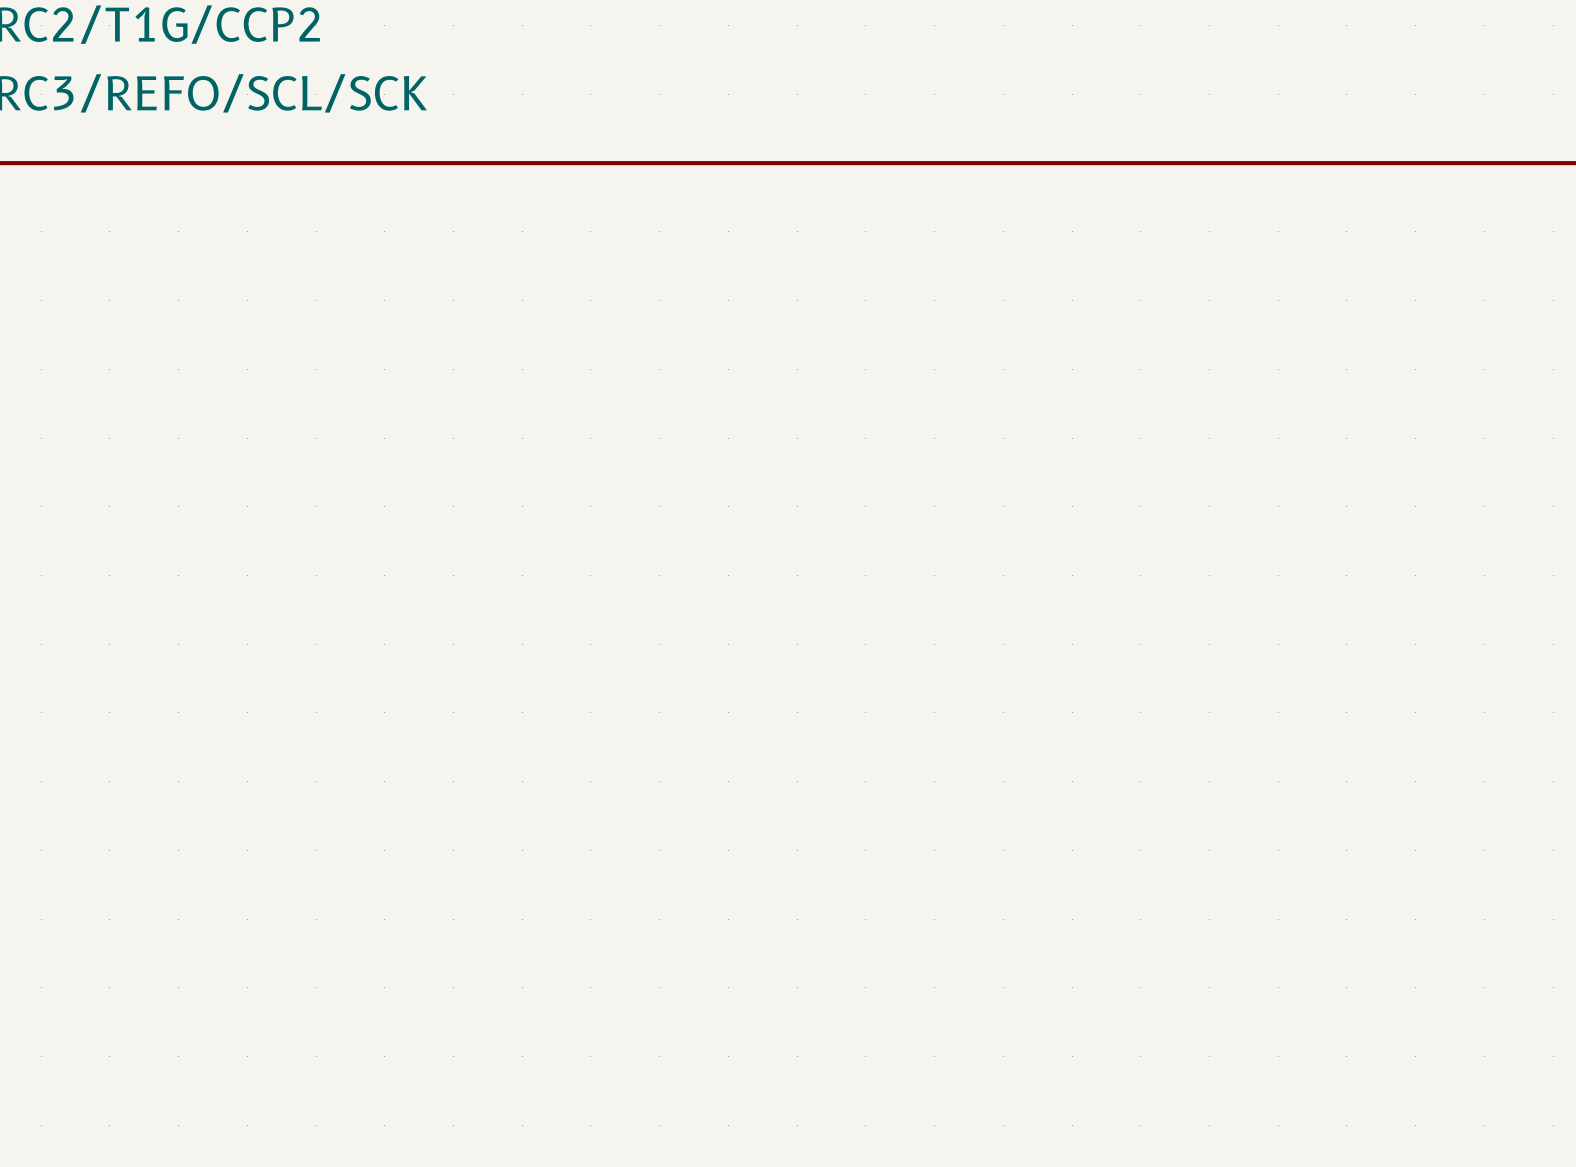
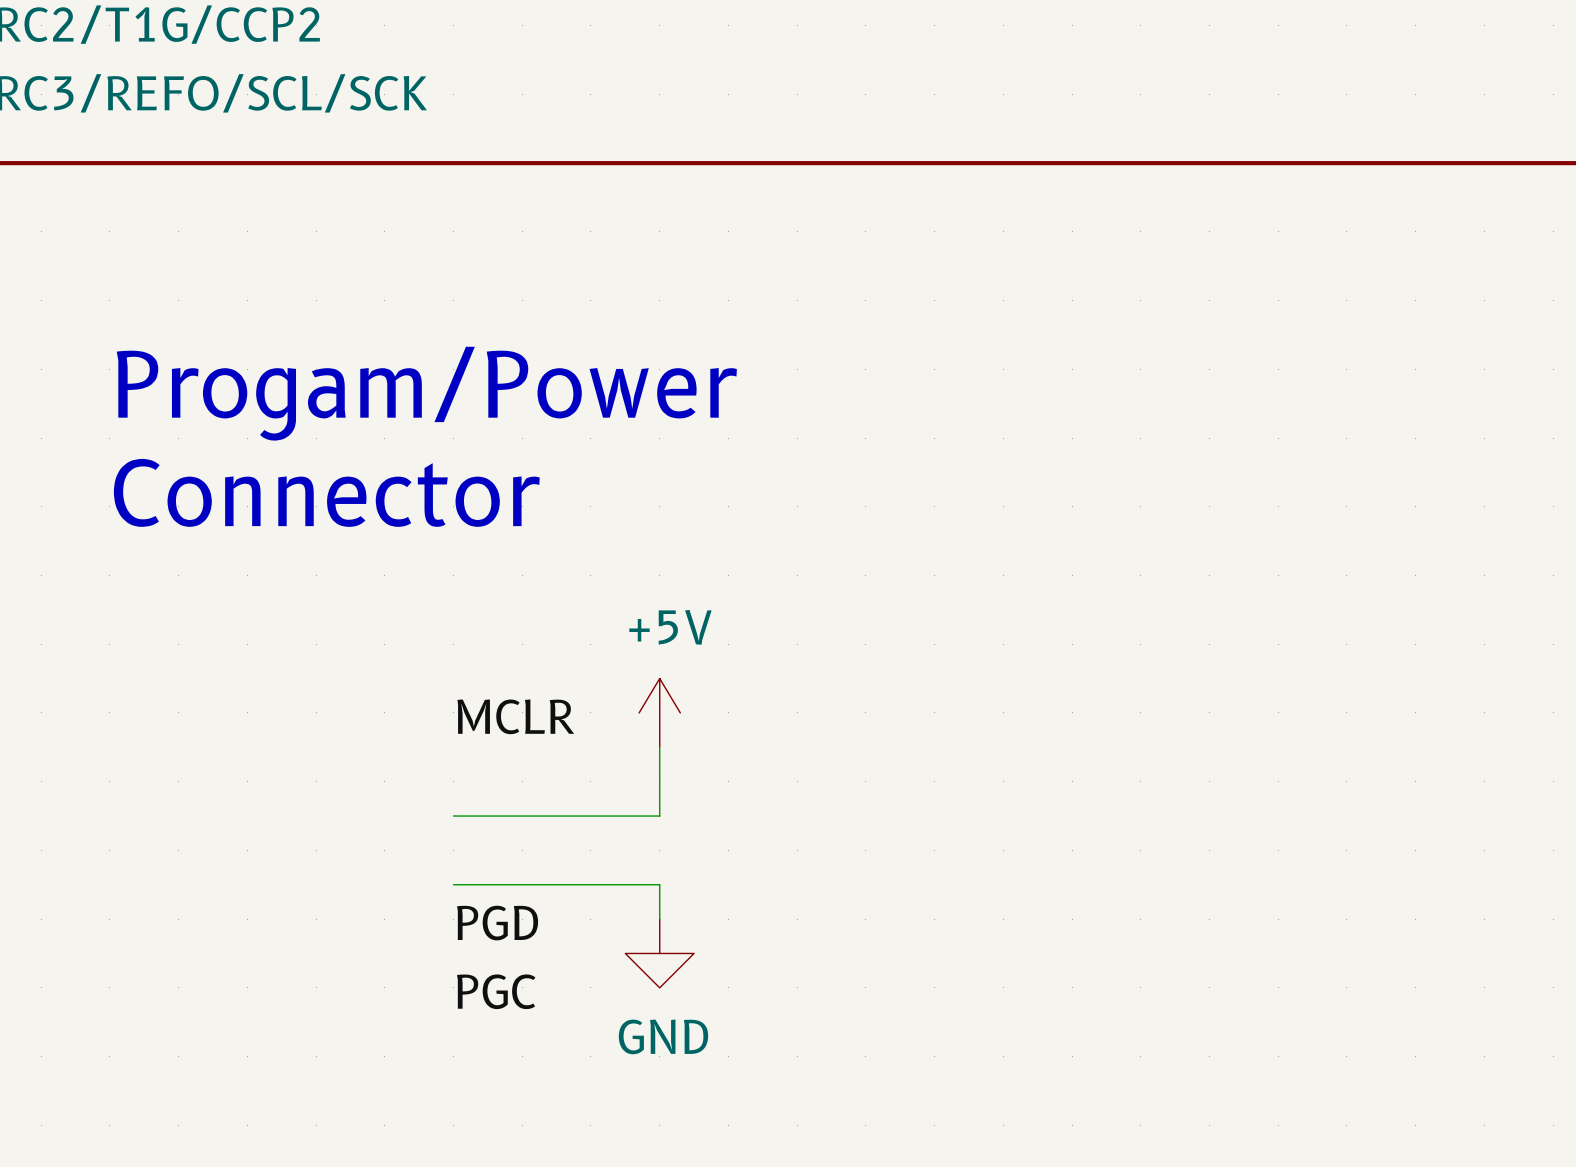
text: none -> Progam/Power (426, 393)
text: none -> Connector (326, 492)
power symbol: none -> +5V (659, 712)
label: none -> MCLR (515, 716)
wire: none -> (659, 747) (659, 816) (453, 816)
wire: none -> (453, 884) (659, 884) (659, 919)
label: none -> PGD (497, 923)
power symbol: none -> GND (659, 953)
label: none -> PGC (496, 991)

